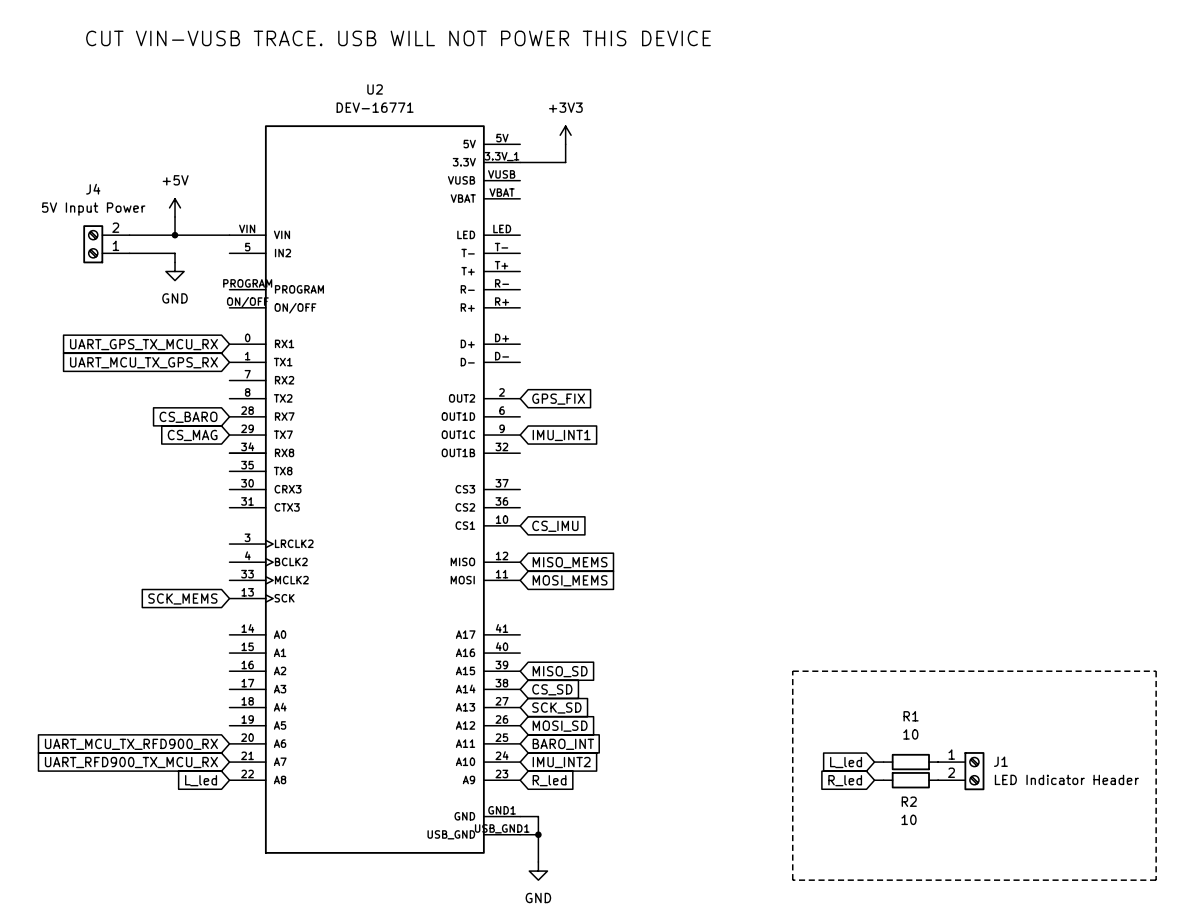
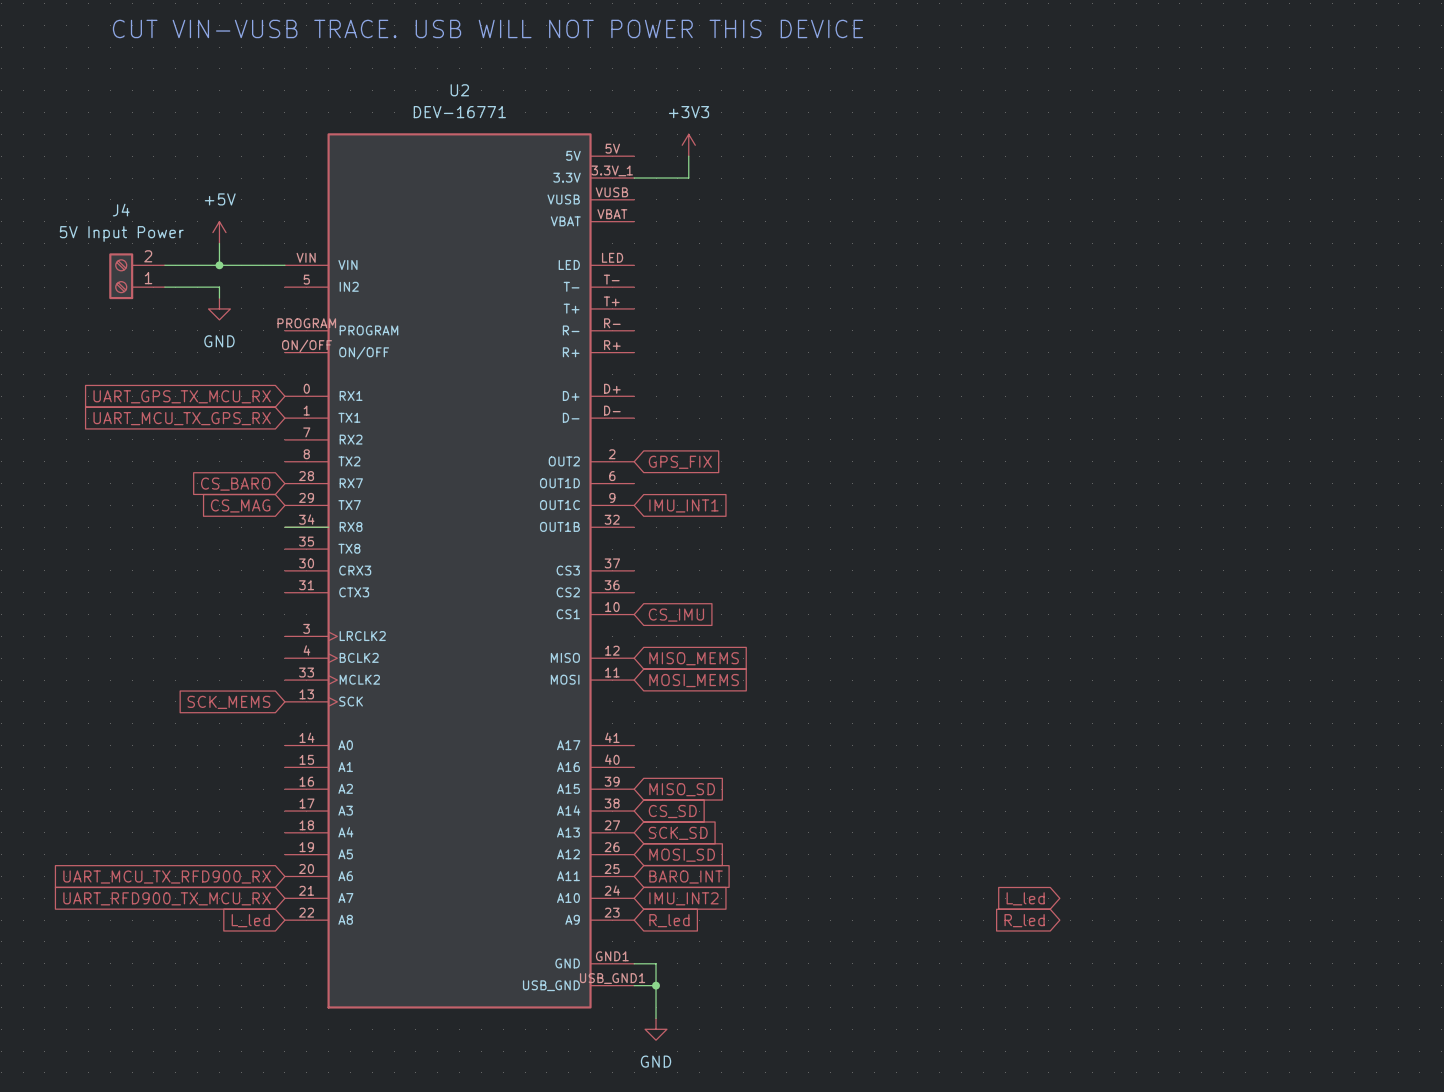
line: (792, 671) (1156, 671) (1156, 880) (792, 880) (792, 671) -> none
wire: (874, 762) (883, 762) -> none
R1: 10 (910, 762) -> none
J1: LED Indicator Header (961, 771) -> none
wire: (874, 780) (883, 780) -> none
R2: 10 (910, 780) -> none

